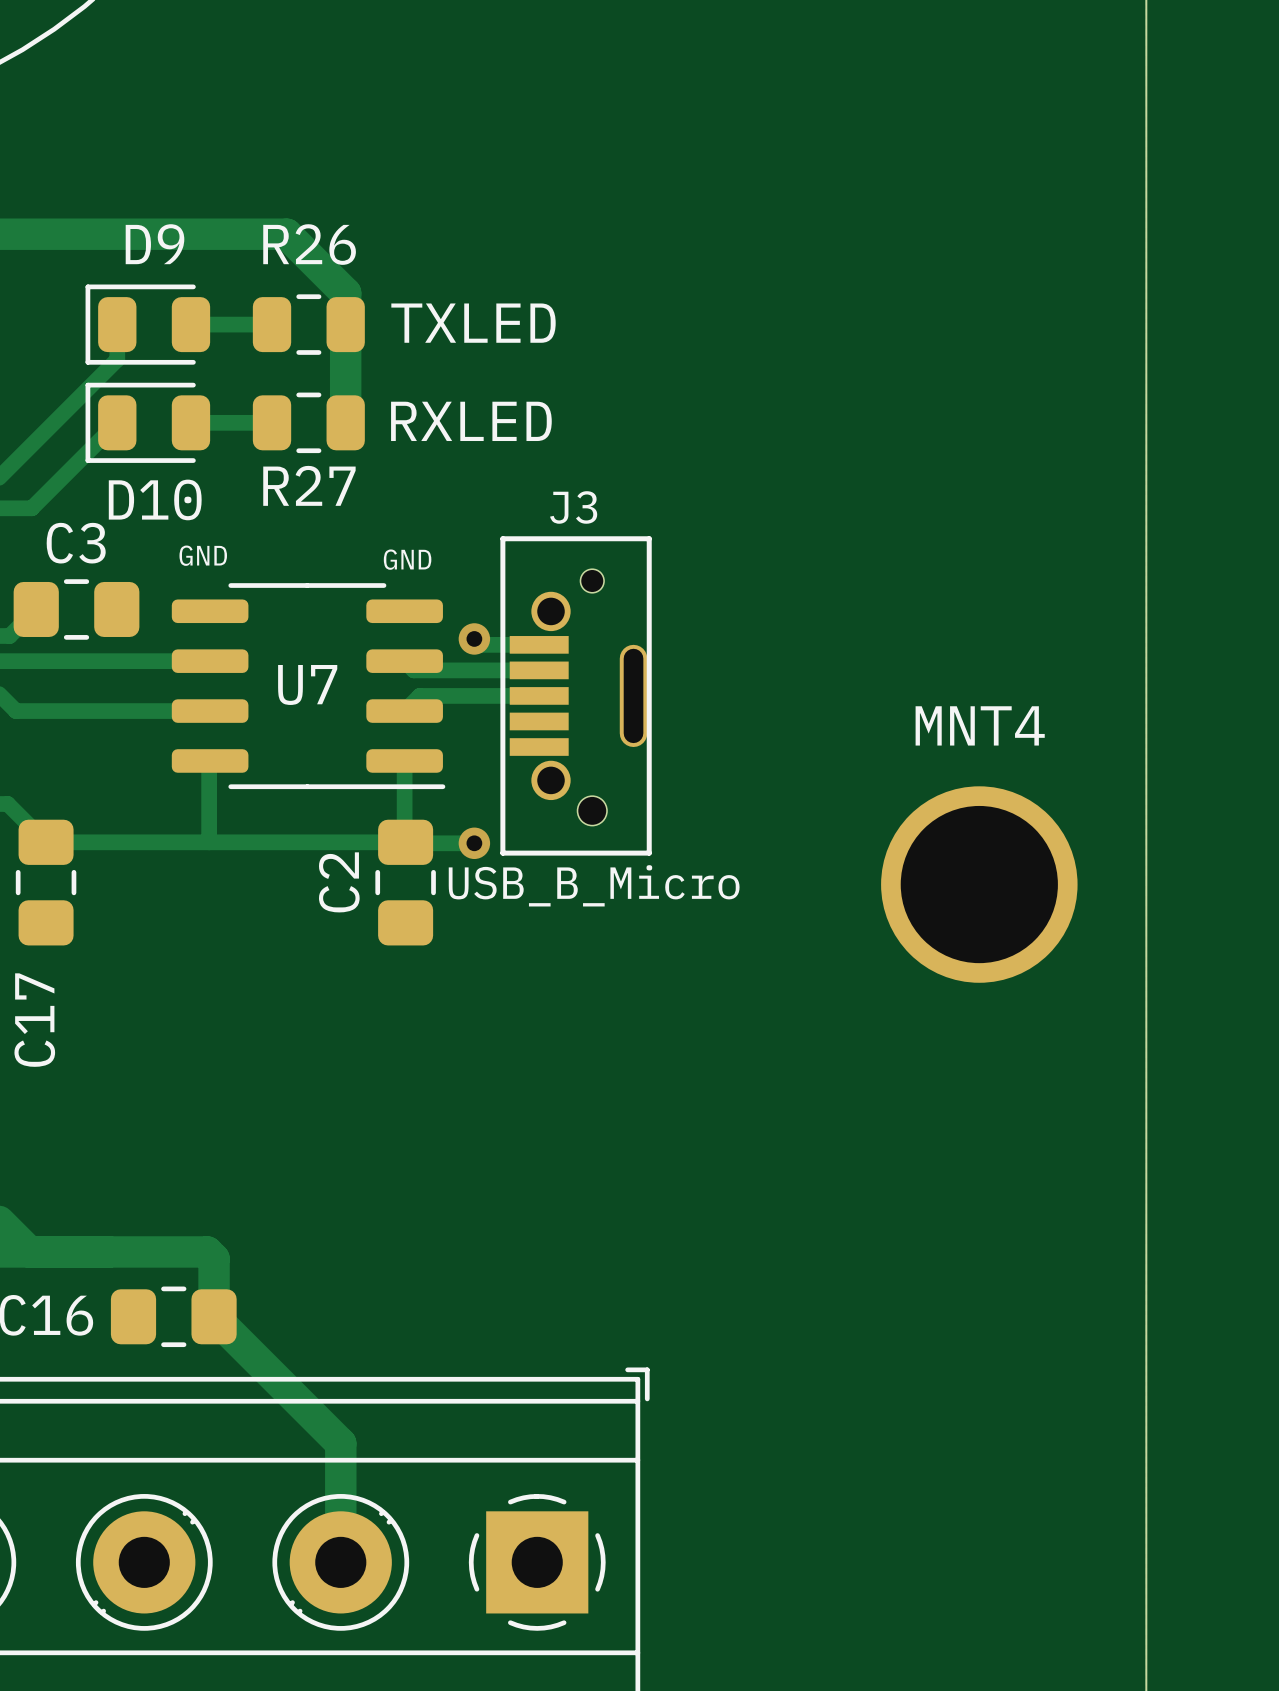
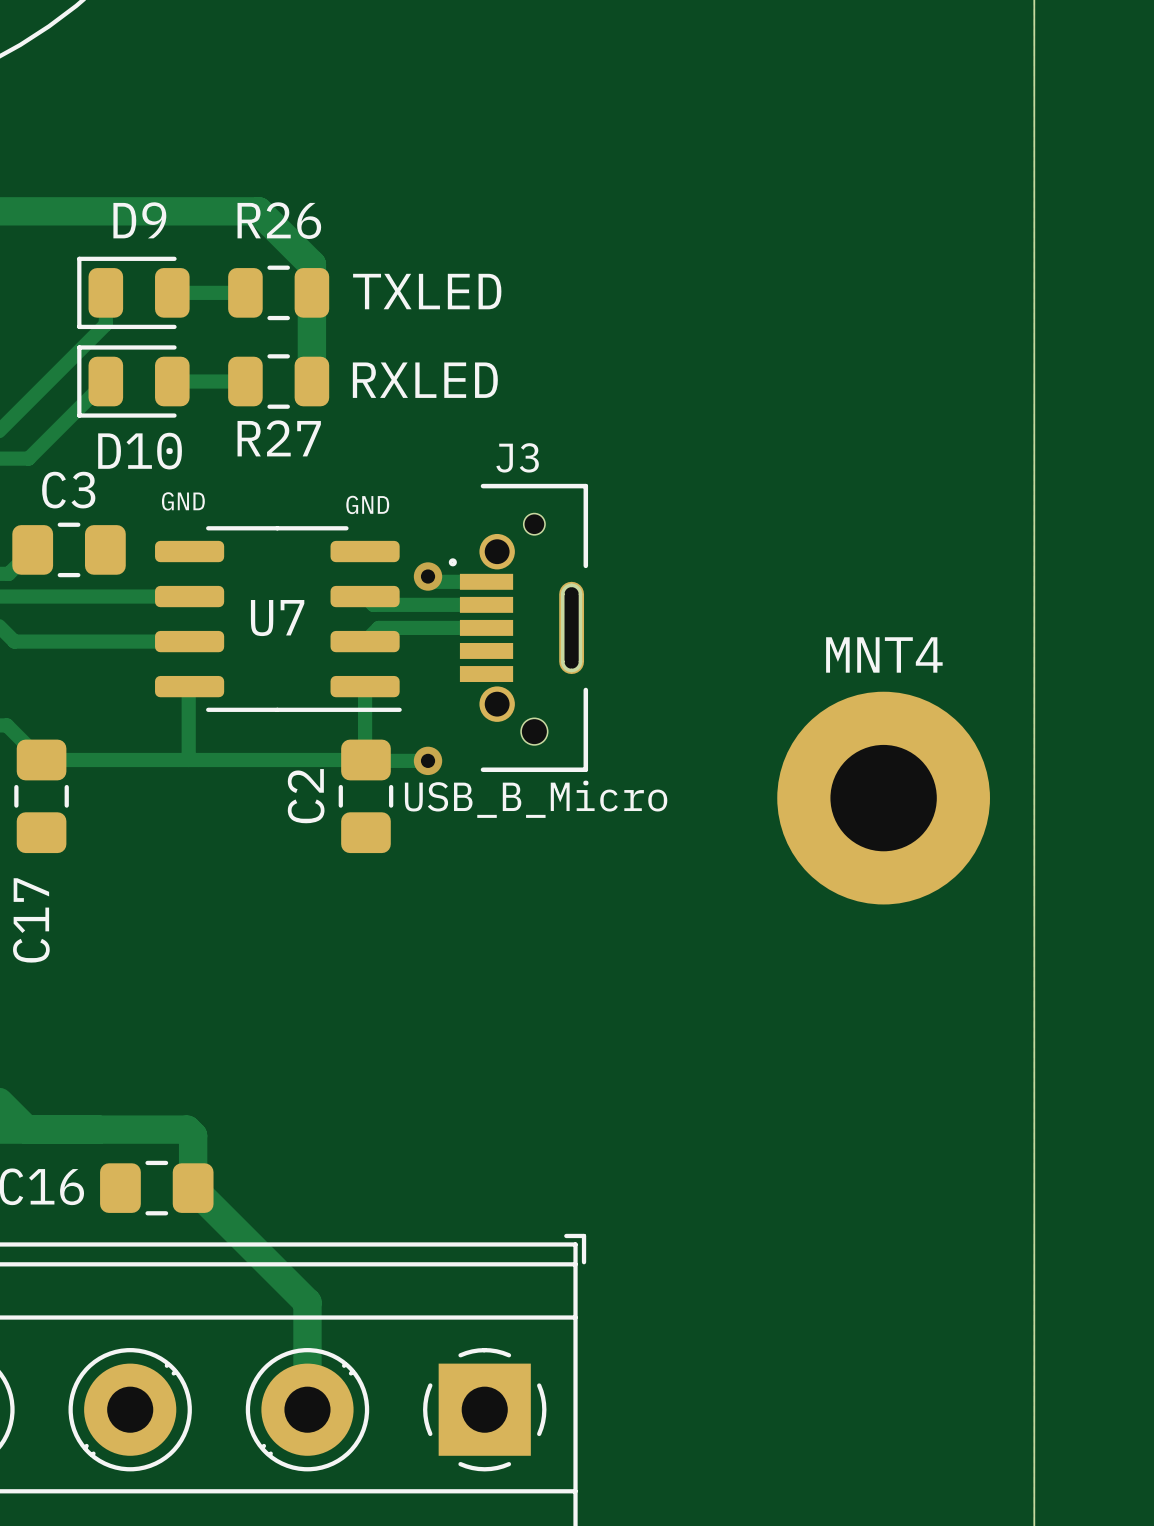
J3 footprint: [500, 536, 652, 856] -> [448, 483, 589, 772]
MNT4 footprint: [881, 786, 1078, 983] -> [777, 691, 990, 905]

